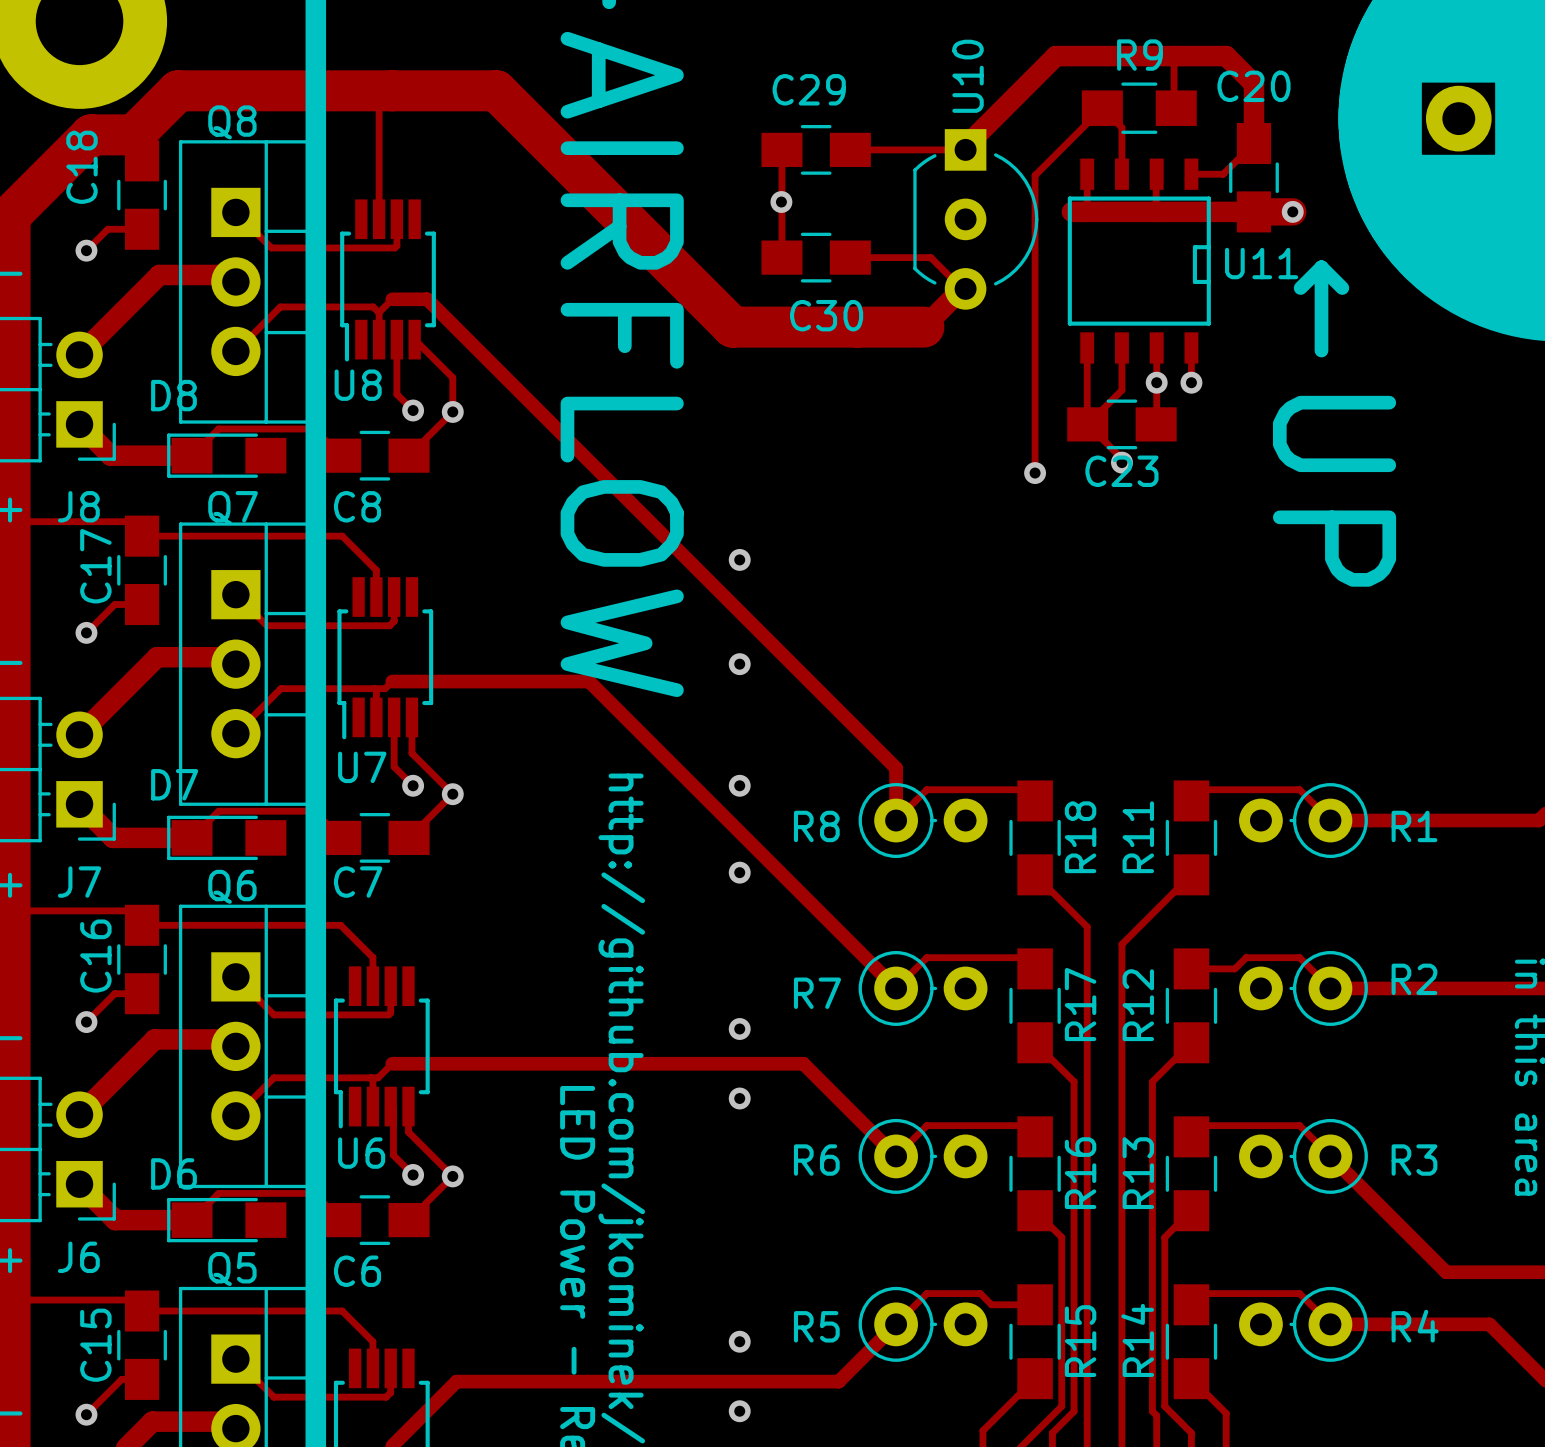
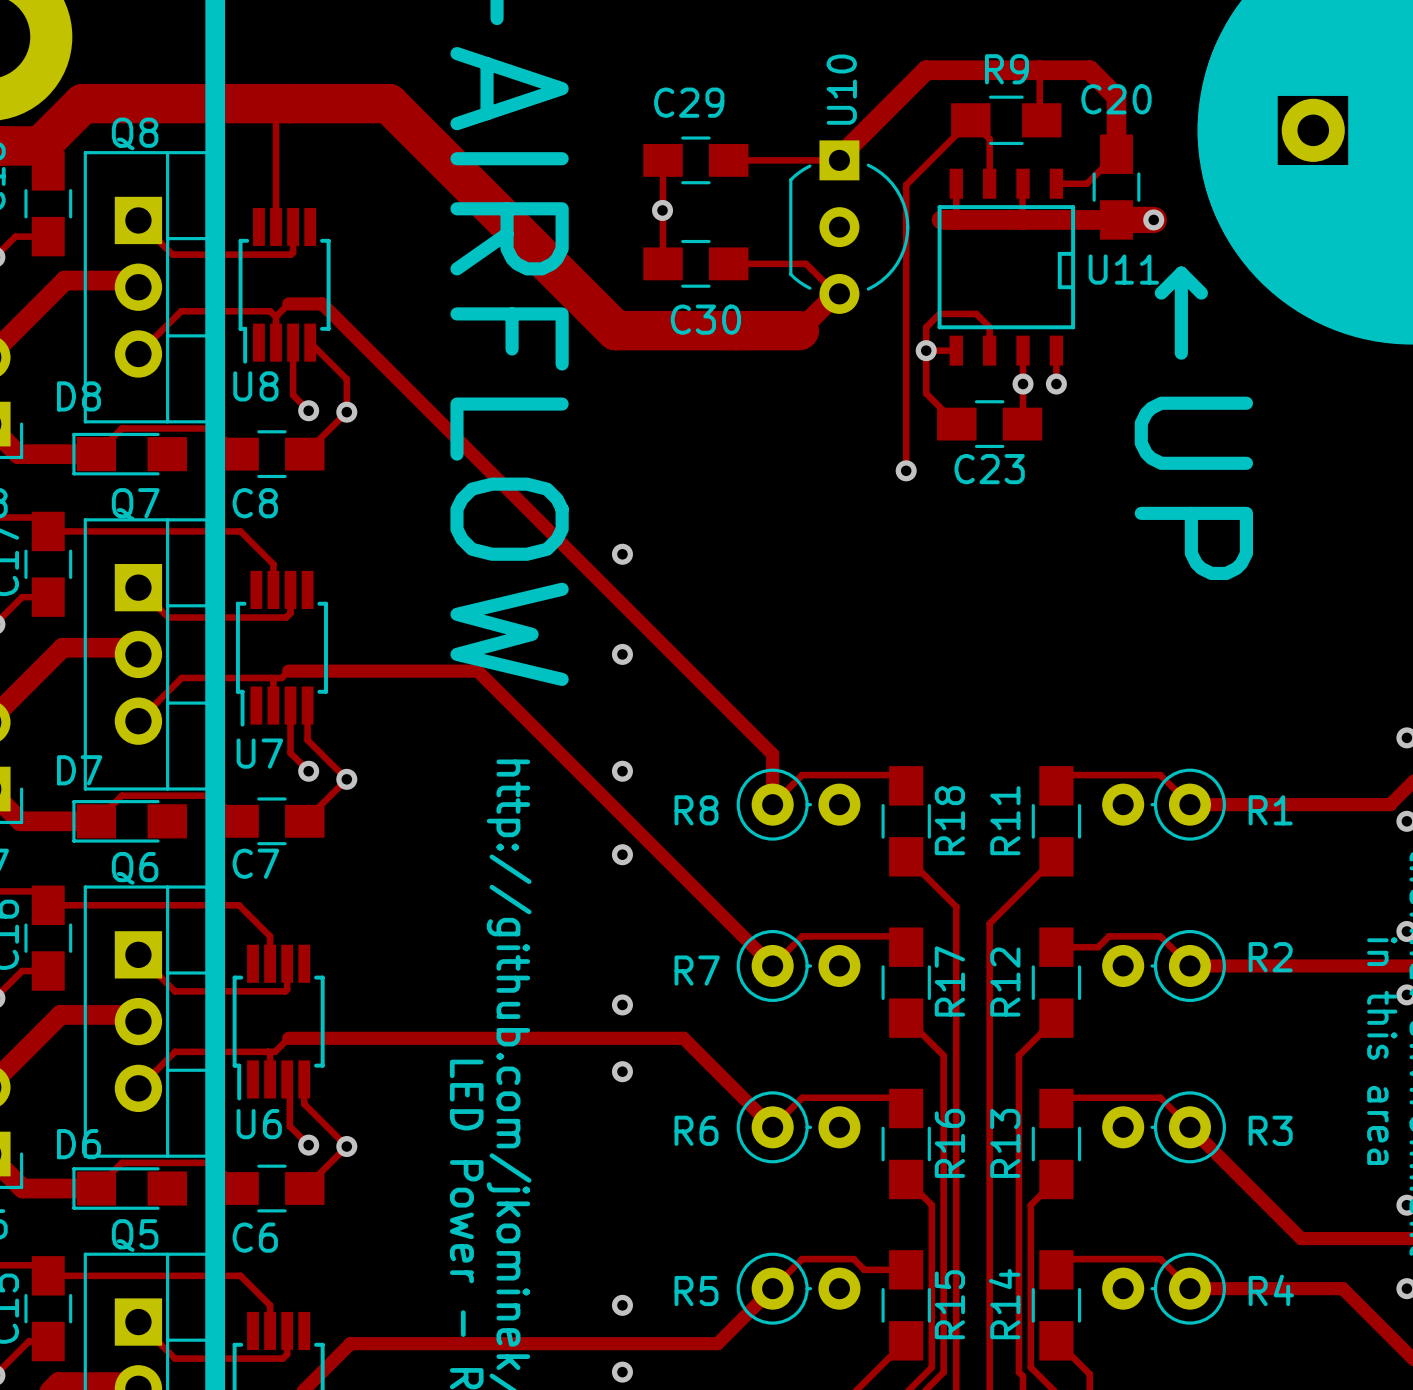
track: none -> (926, 350) (956, 350)
track: (1087, 347) (1087, 423) -> (989, 350) (989, 327) (976, 313) (939, 313) (926, 327) (926, 393) (956, 423)
track: (1121, 347) (1121, 390) (1087, 424) (1121, 458) (1121, 462) -> none
via position: (1121, 462) -> (926, 350)

